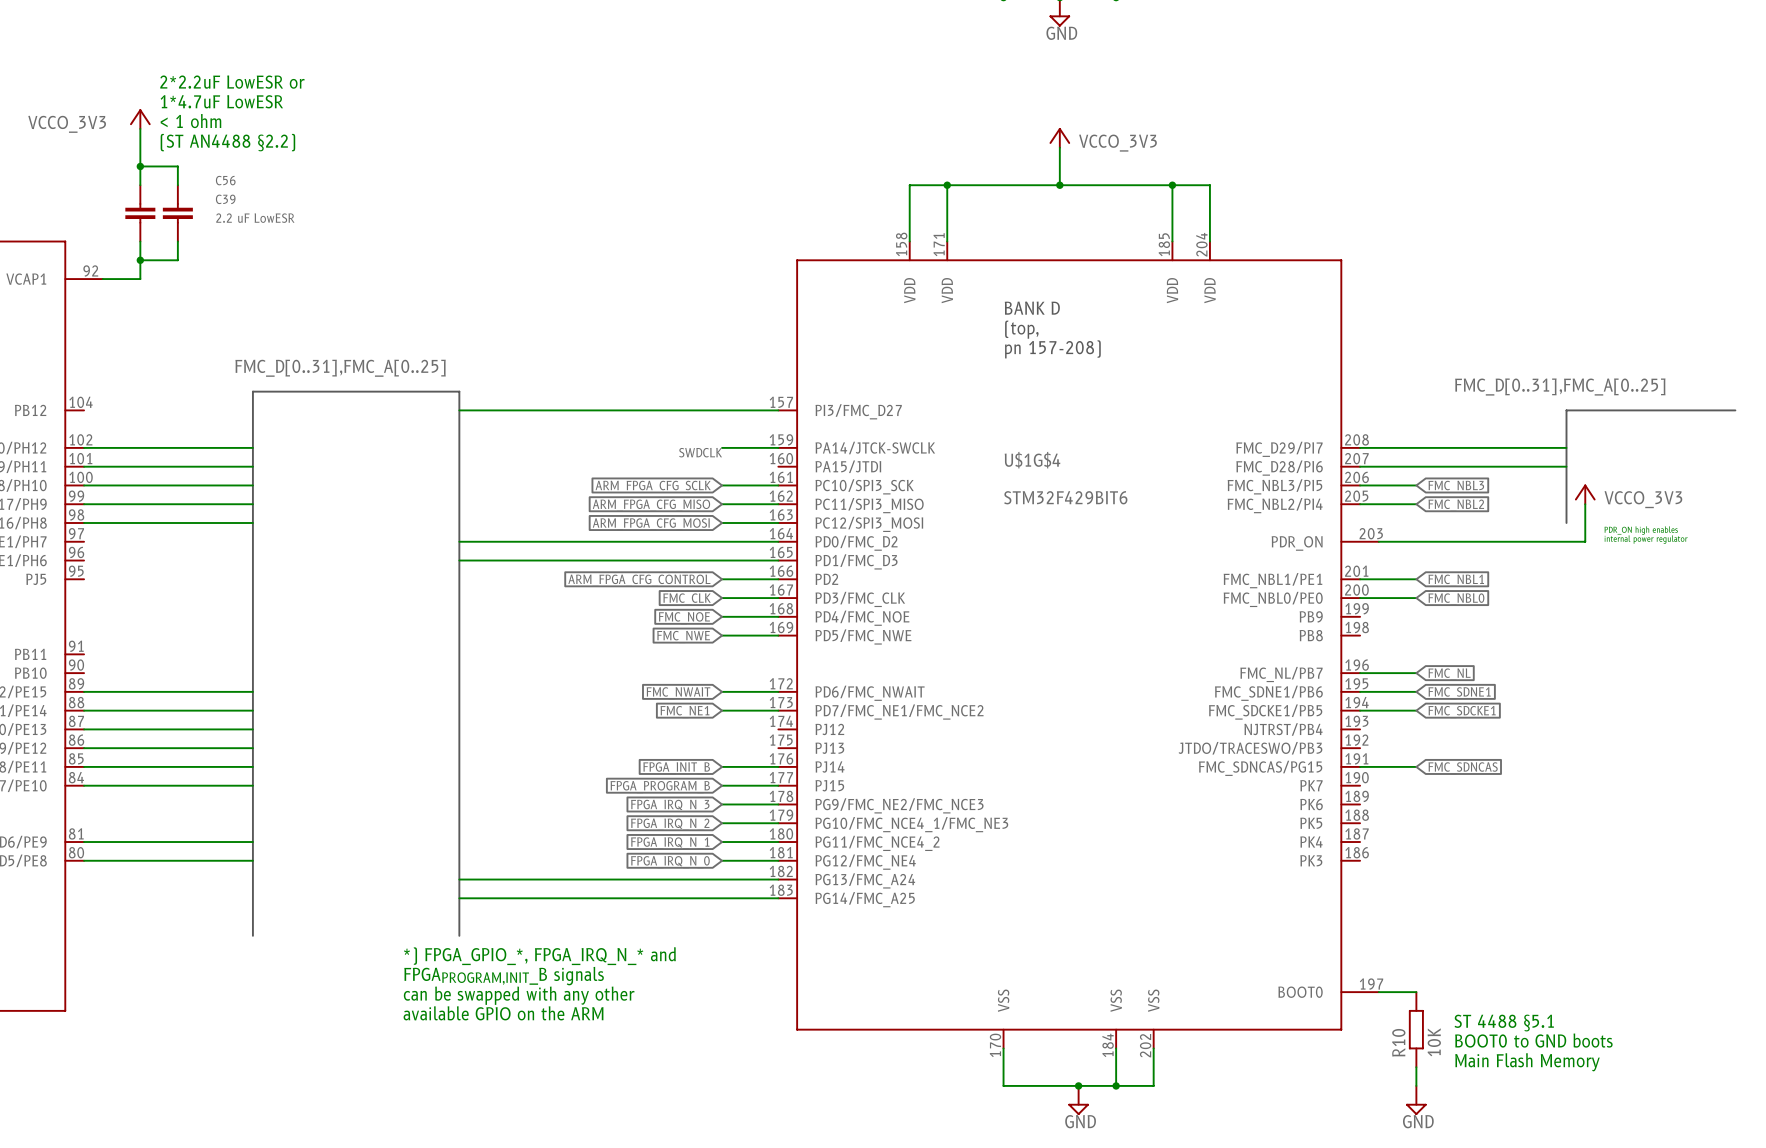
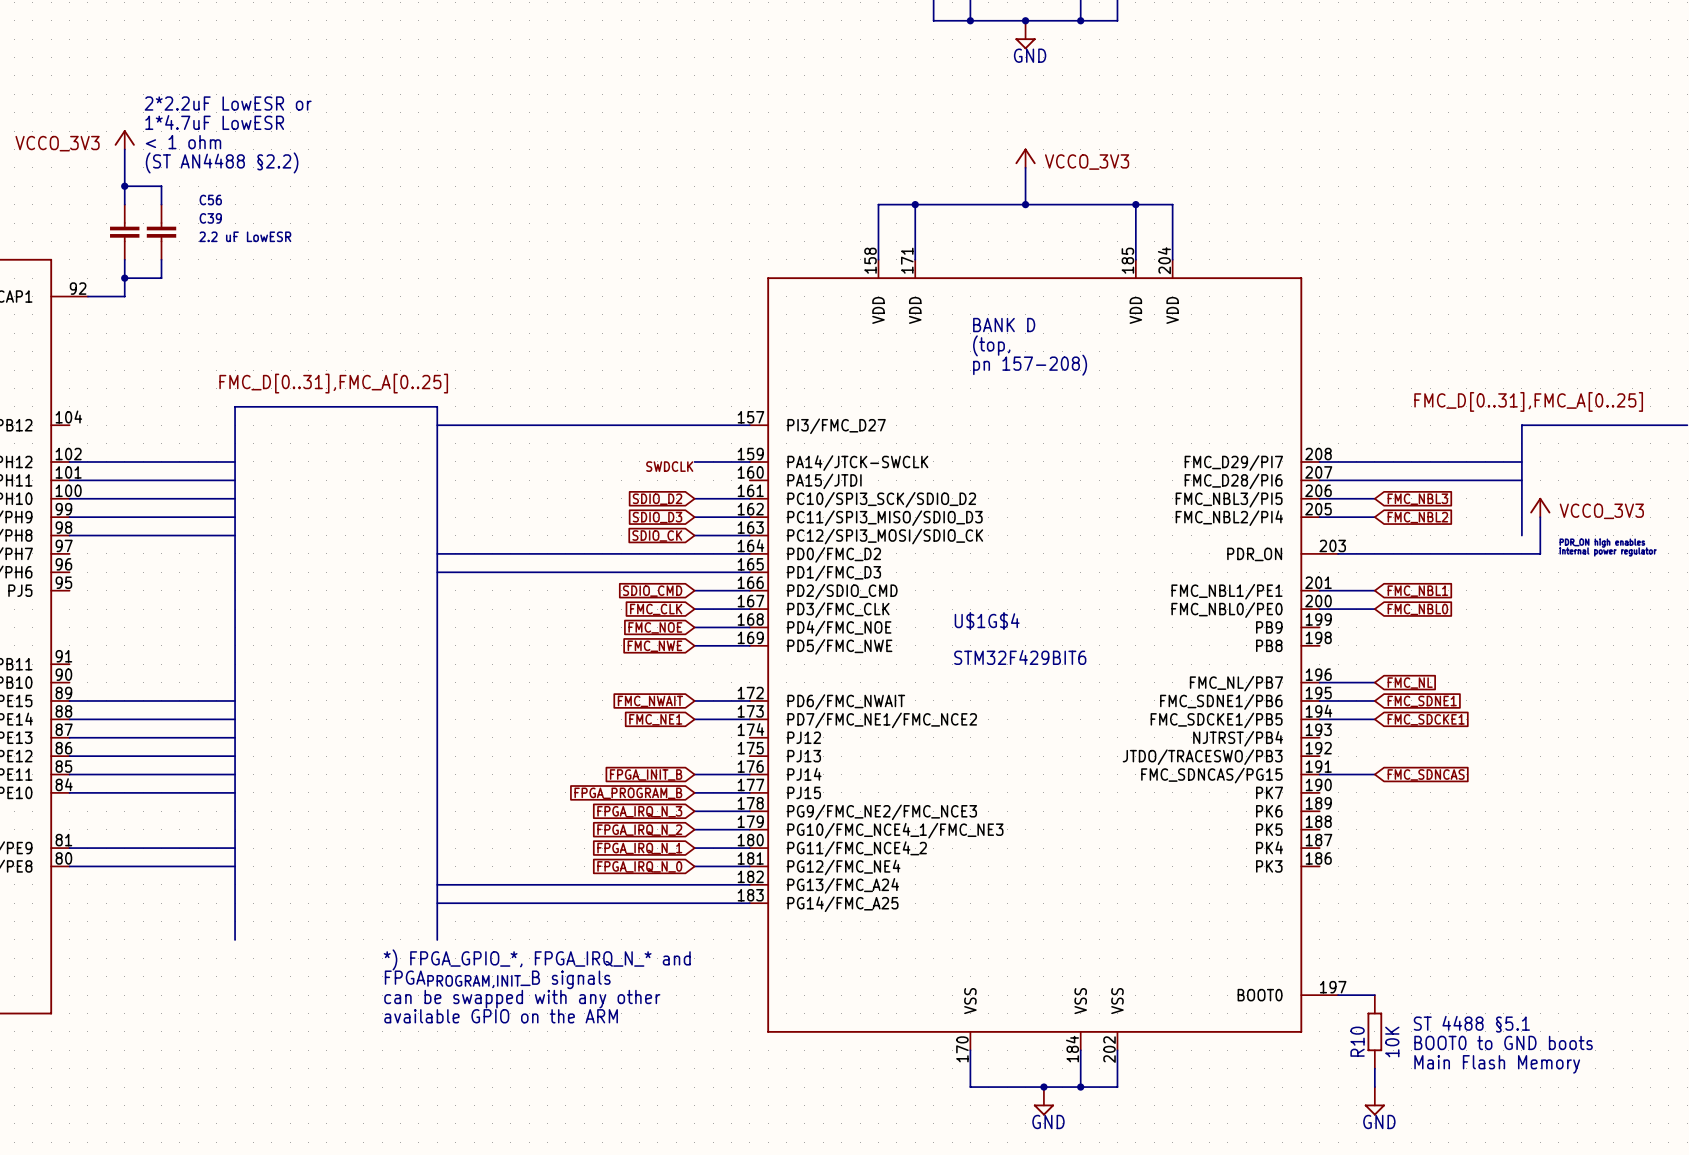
U$1G$4 name position: U$1G$4 (1032, 460) -> U$1G$4 (987, 621)
global label: ARM_FPGA_CFG_SCLK (653, 486) -> SDIO_D2 (657, 499)
U$1G$4 pin name: PC10/SPI3_SCK (864, 486) -> PC10/SPI3_SCK/SDIO_D2 (881, 499)
U$1G$4 value position: STM32F429BIT6 (1065, 497) -> STM32F429BIT6 (1020, 657)
global label: ARM_FPGA_CFG_MISO (651, 505) -> SDIO_D3 (657, 517)
U$1G$4 pin name: PC11/SPI3_MISO (869, 505) -> PC11/SPI3_MISO/SDIO_D3 (885, 518)
global label: ARM_FPGA_CFG_MOSI (651, 524) -> SDIO_CK (657, 535)
U$1G$4 pin name: PC12/SPI3_MOSI (869, 524) -> PC12/SPI3_MOSI/SDIO_CK (885, 536)
U$1G$4 pin name: PD2 (826, 579) -> PD2/SDIO_CMD (842, 591)
global label: ARM_FPGA_CFG_CONTROL (639, 580) -> SDIO_CMD (652, 591)

